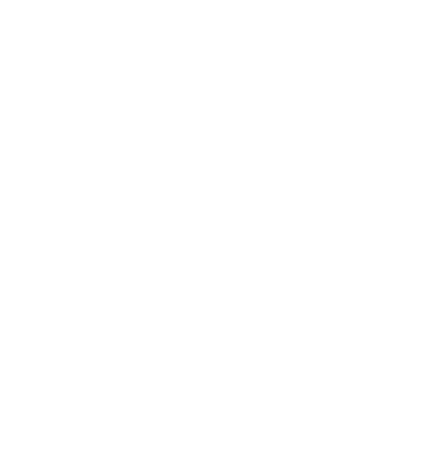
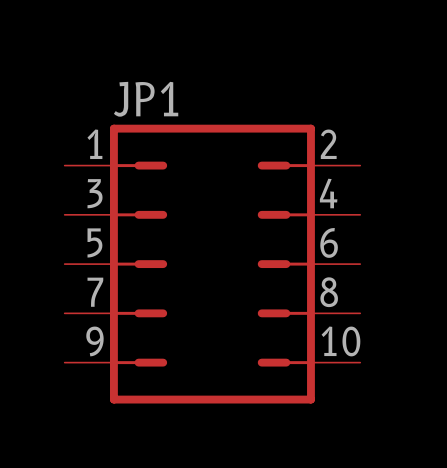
JP1: none -> (212, 264)

